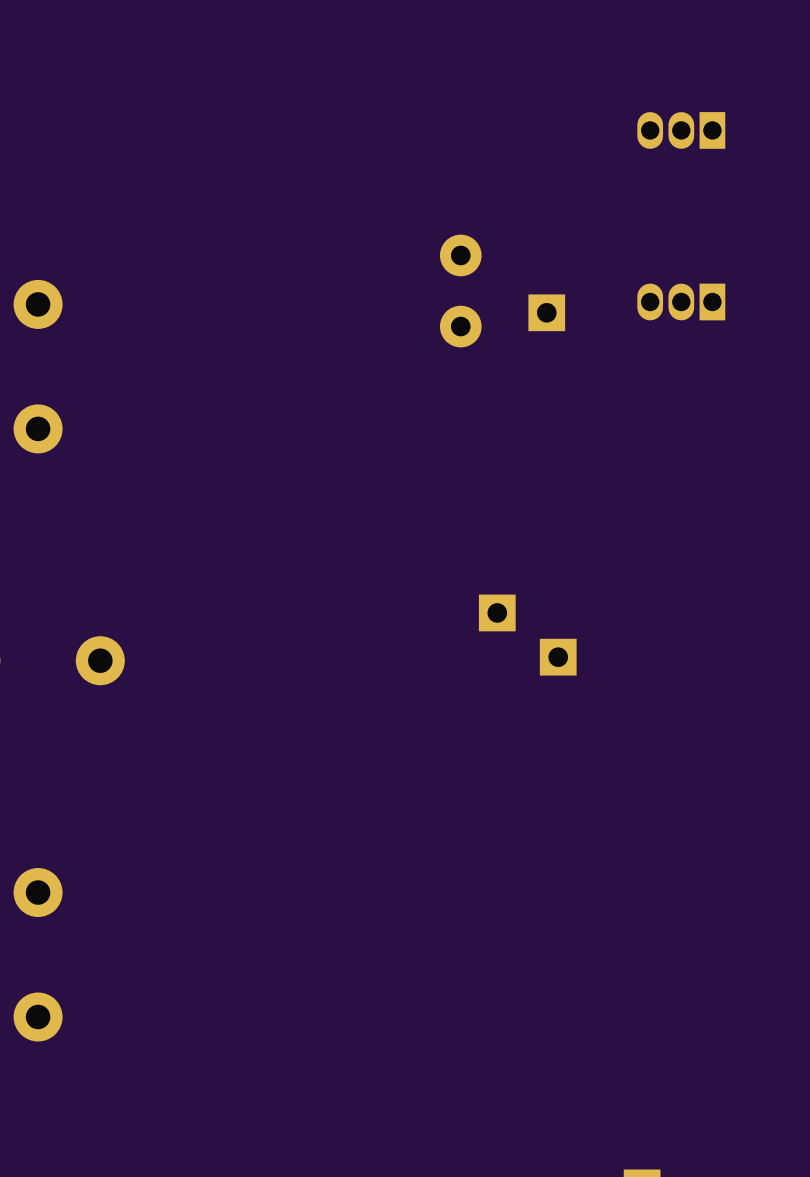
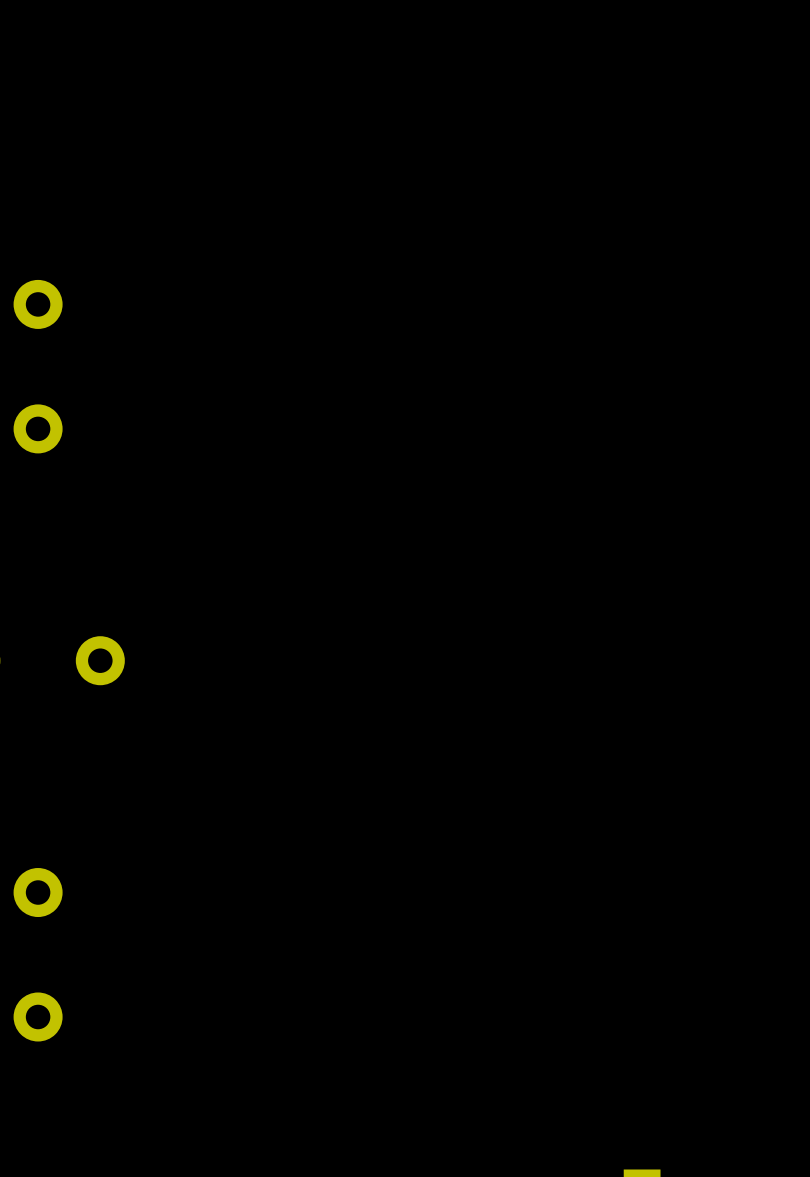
part: (681, 130) -> none
part: (460, 291) -> none
part: (681, 301) -> none
part: (546, 312) -> none
part: (497, 612) -> none
part: (558, 657) -> none

